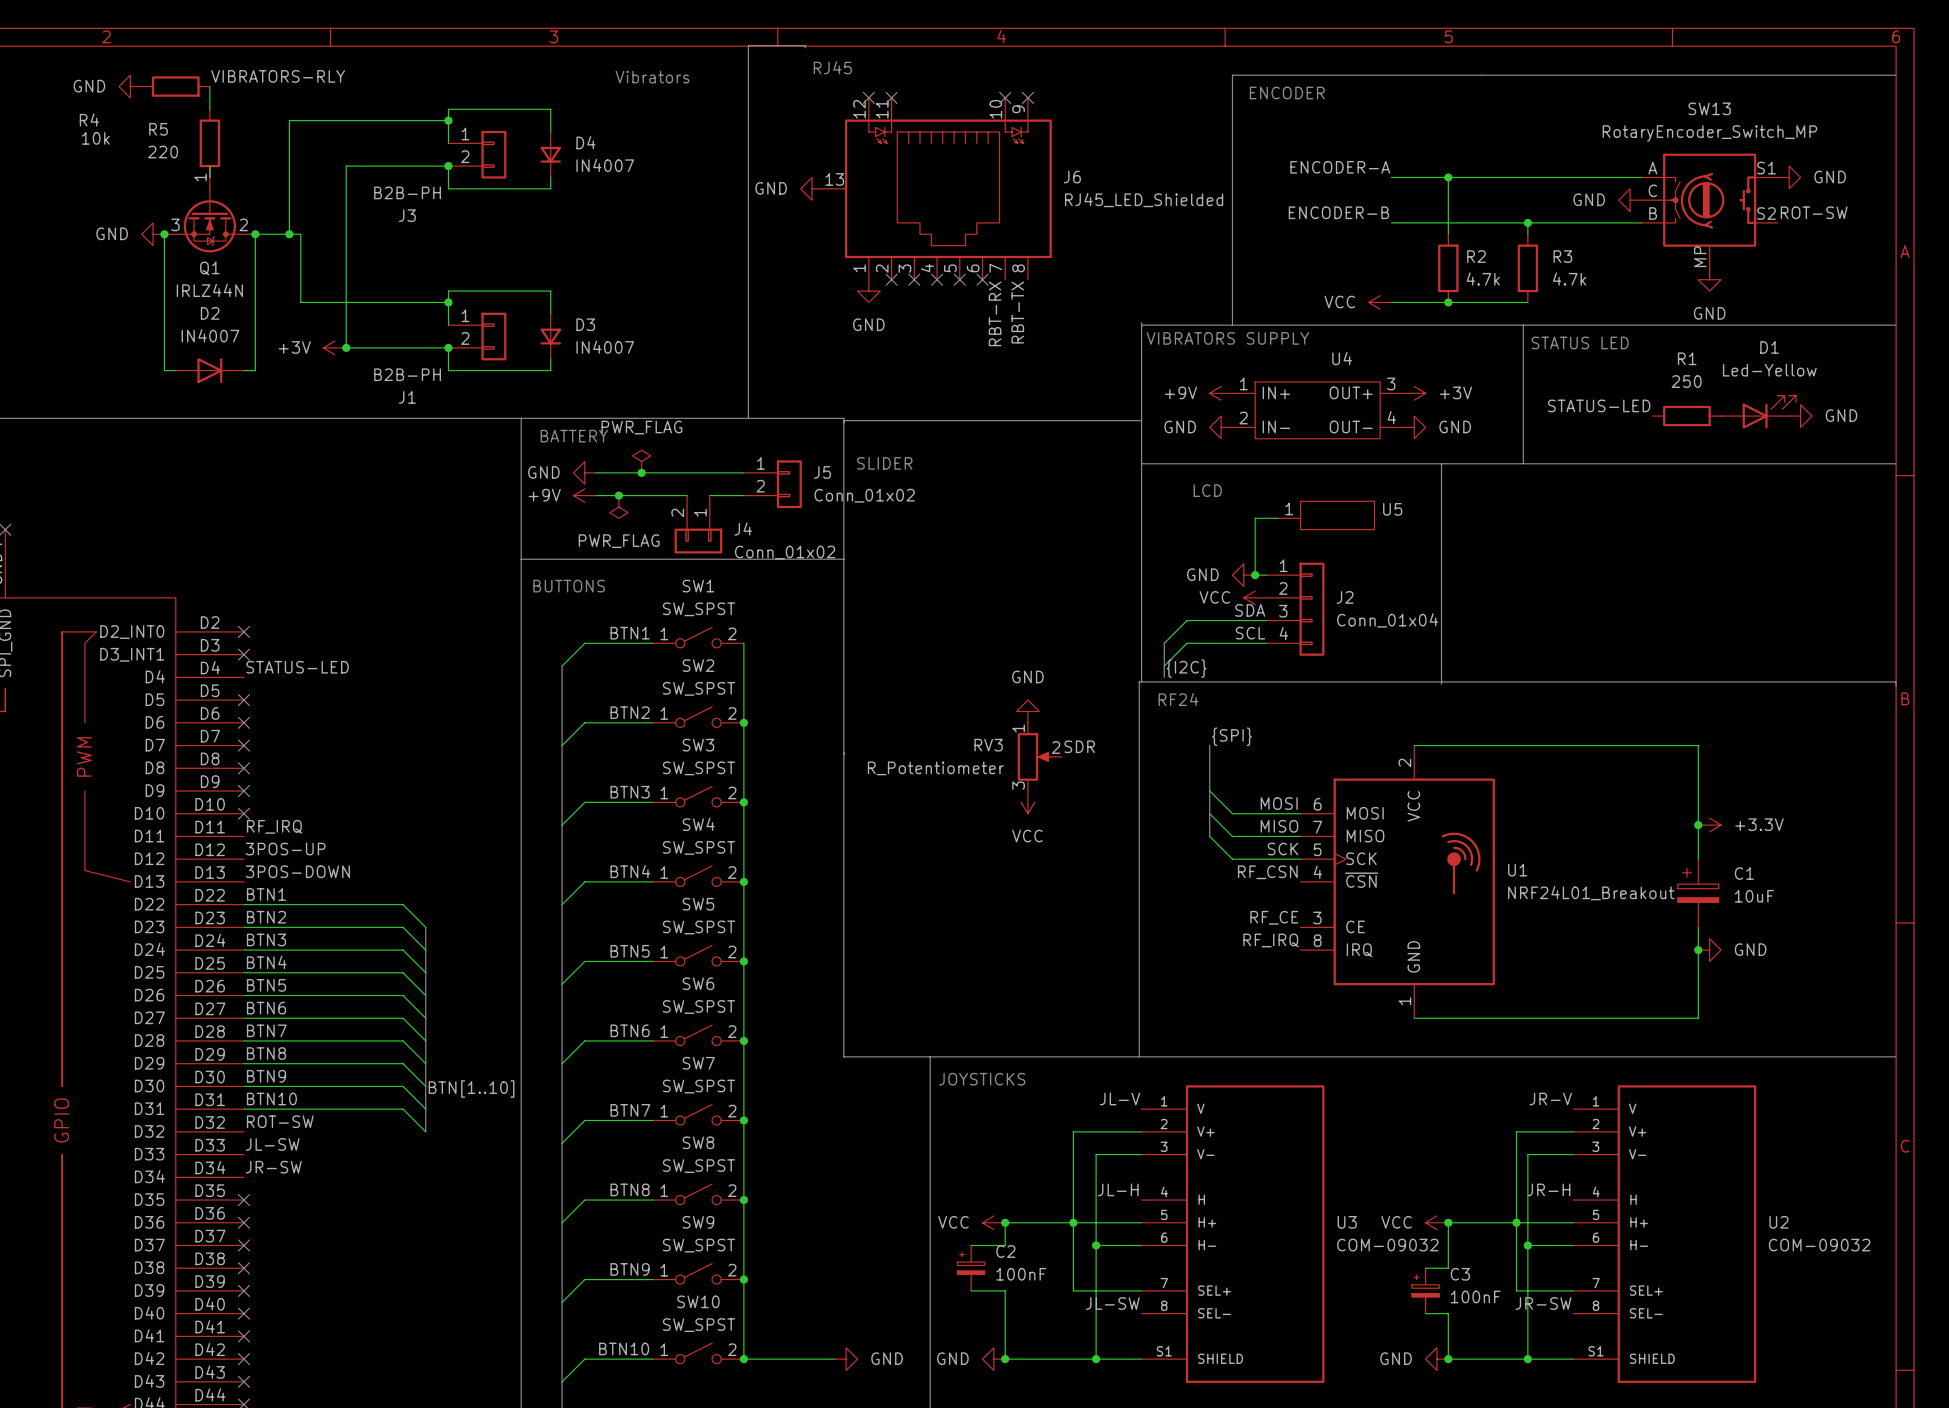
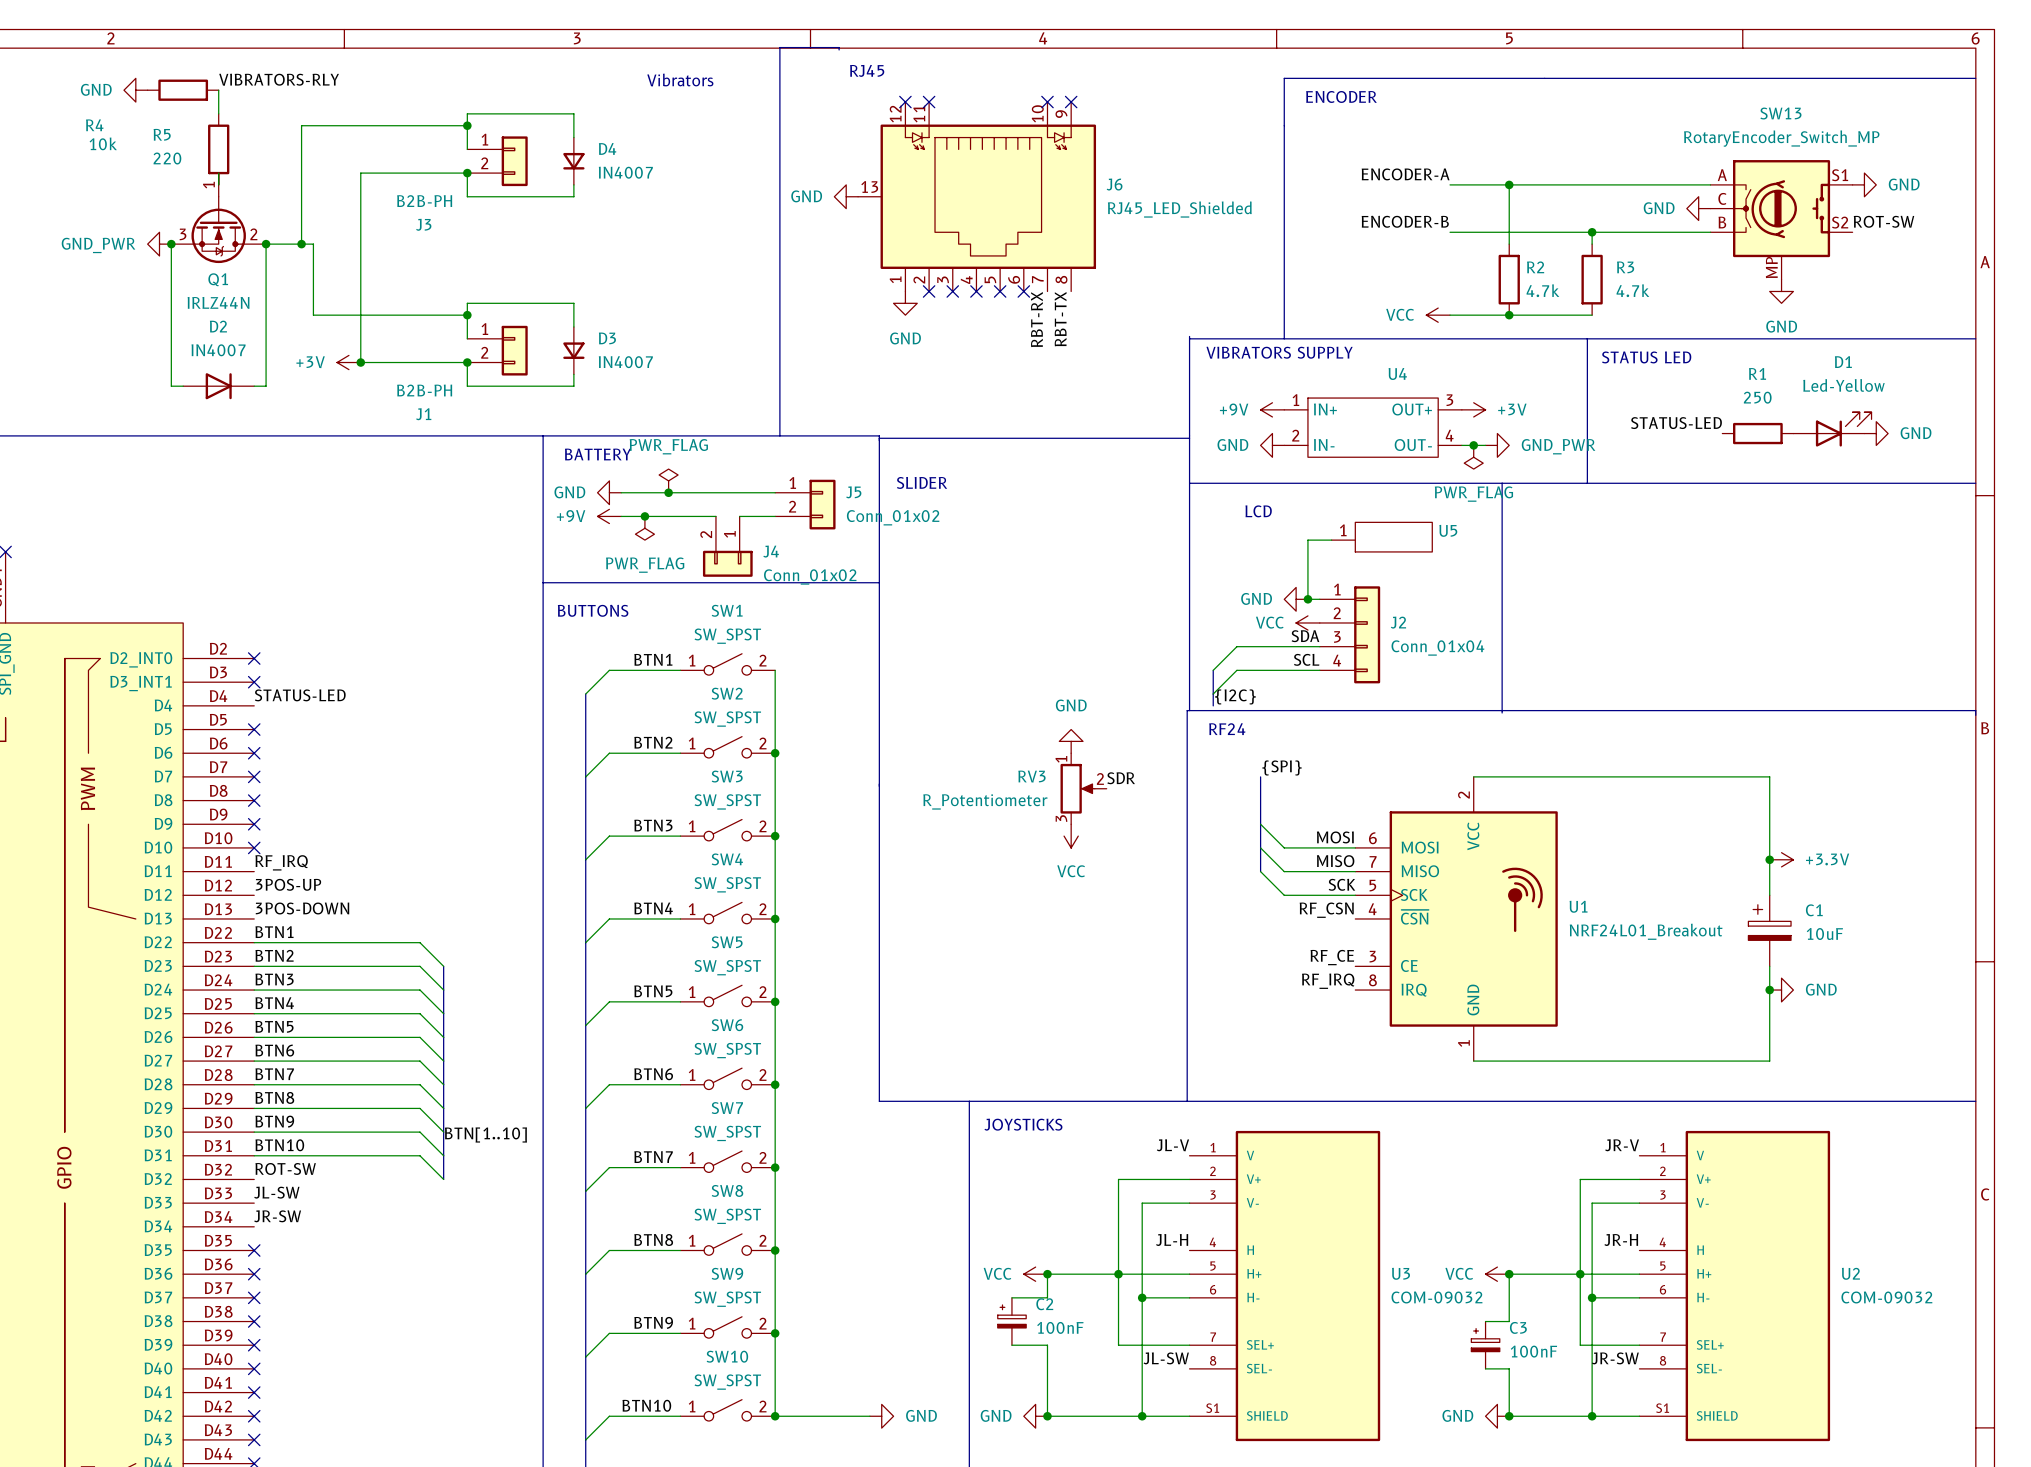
power symbol: GND (153, 234) -> GND_PWR (159, 244)
power symbol: GND (1414, 427) -> none
junction: none -> (1473, 445)
power symbol: none -> GND_PWR (1497, 445)
power symbol: none -> PWR_FLAG (1473, 457)

